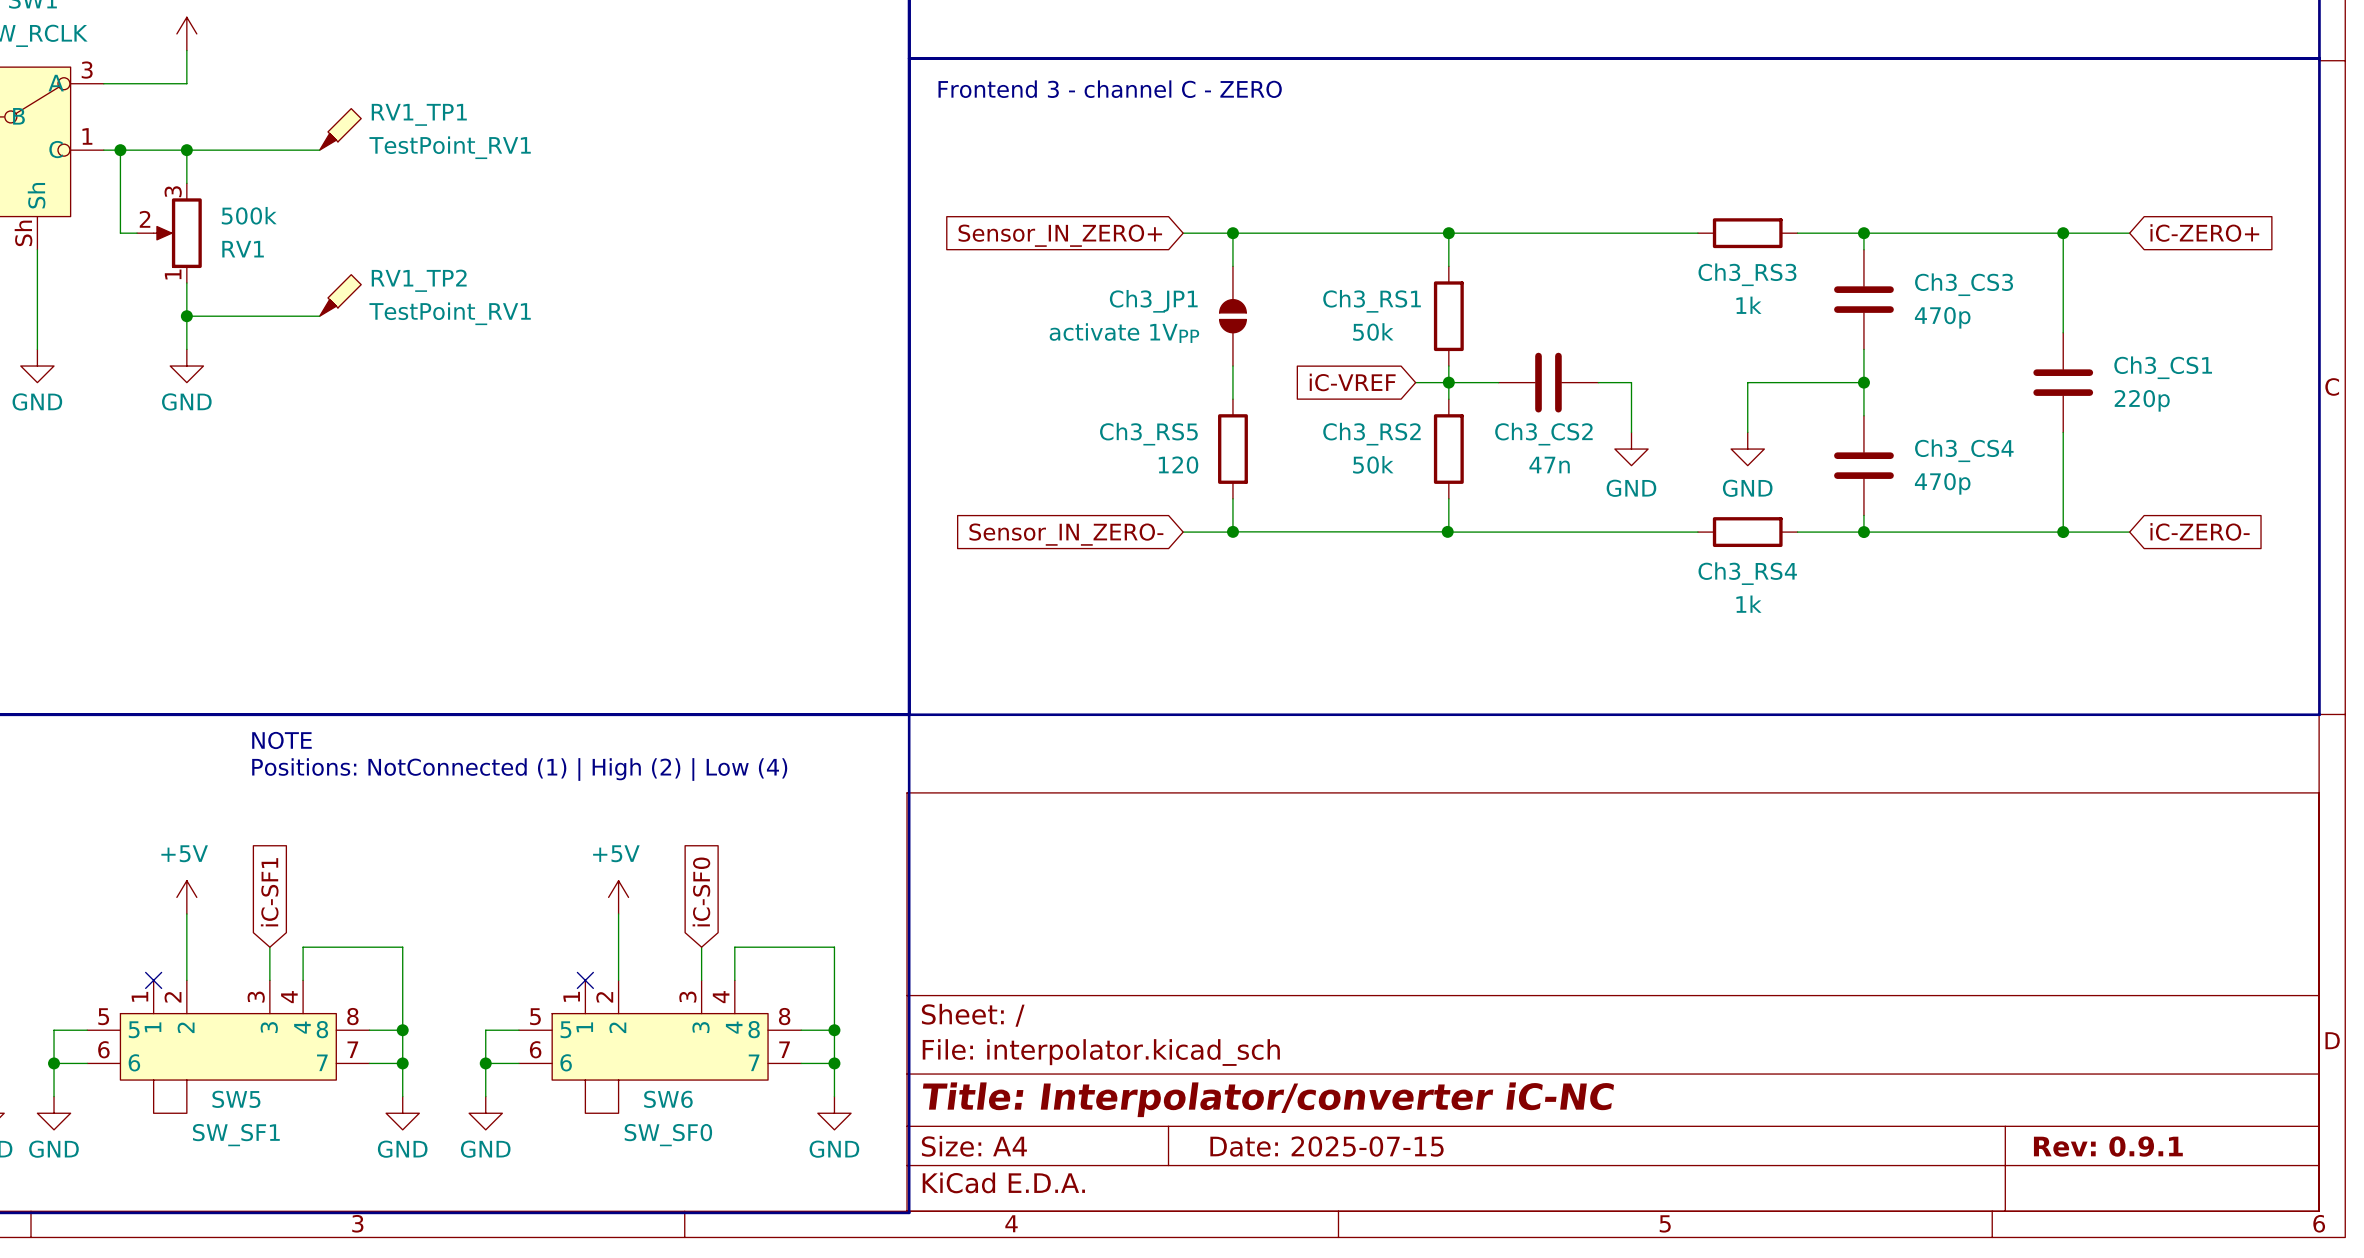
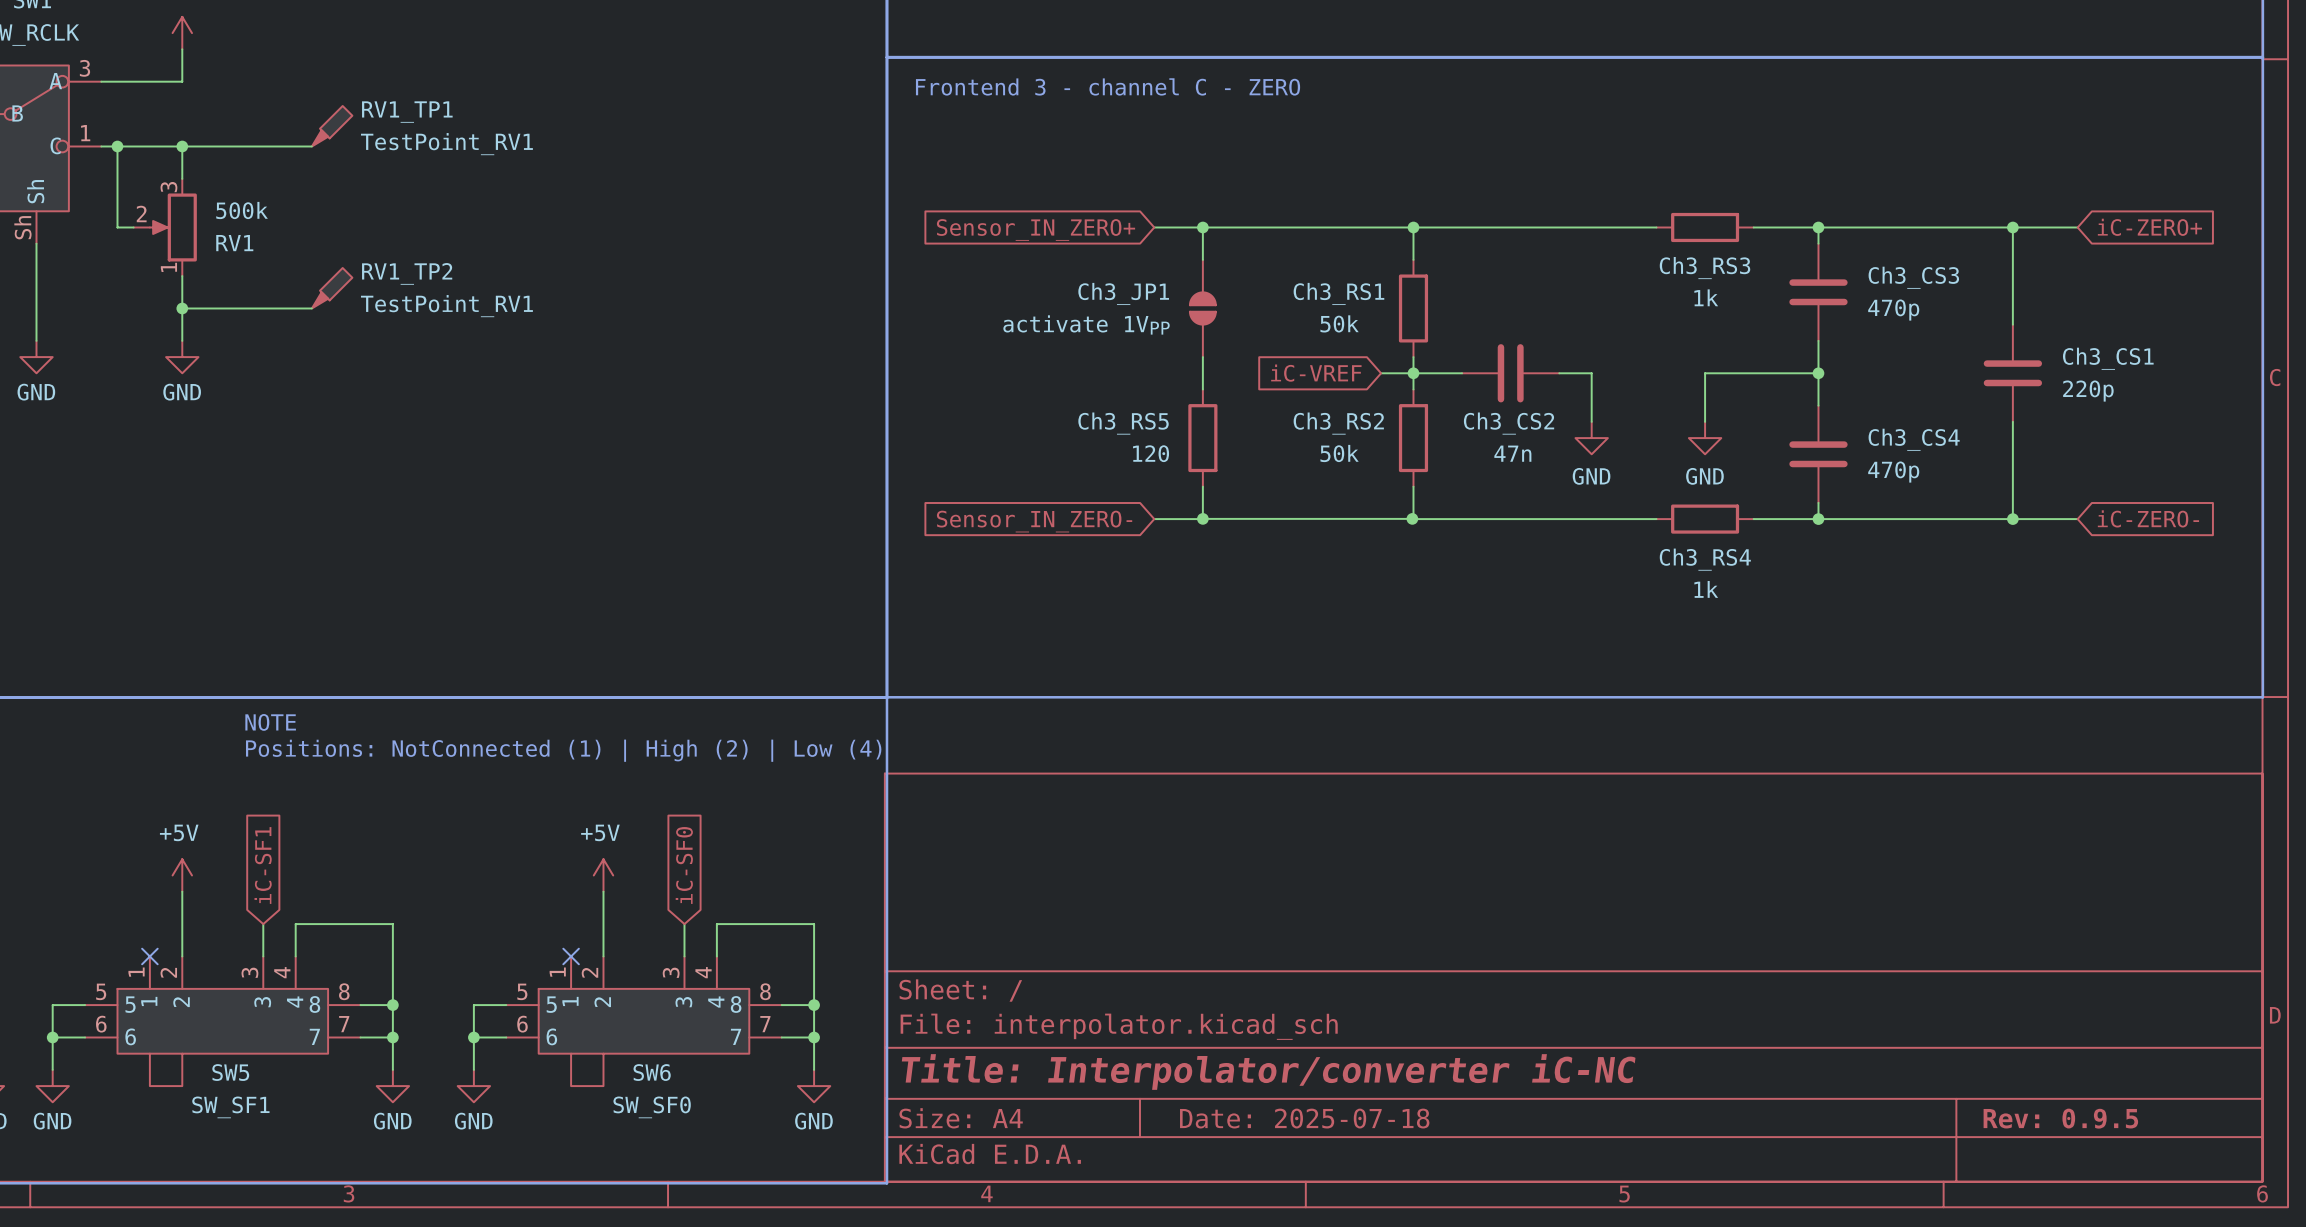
title block: Date: 2025-07-15 (1327, 1146) -> Date: 2025-07-18 (1304, 1118)
title block: Rev: 0.9.1 (2108, 1146) -> Rev: 0.9.5 (2060, 1118)

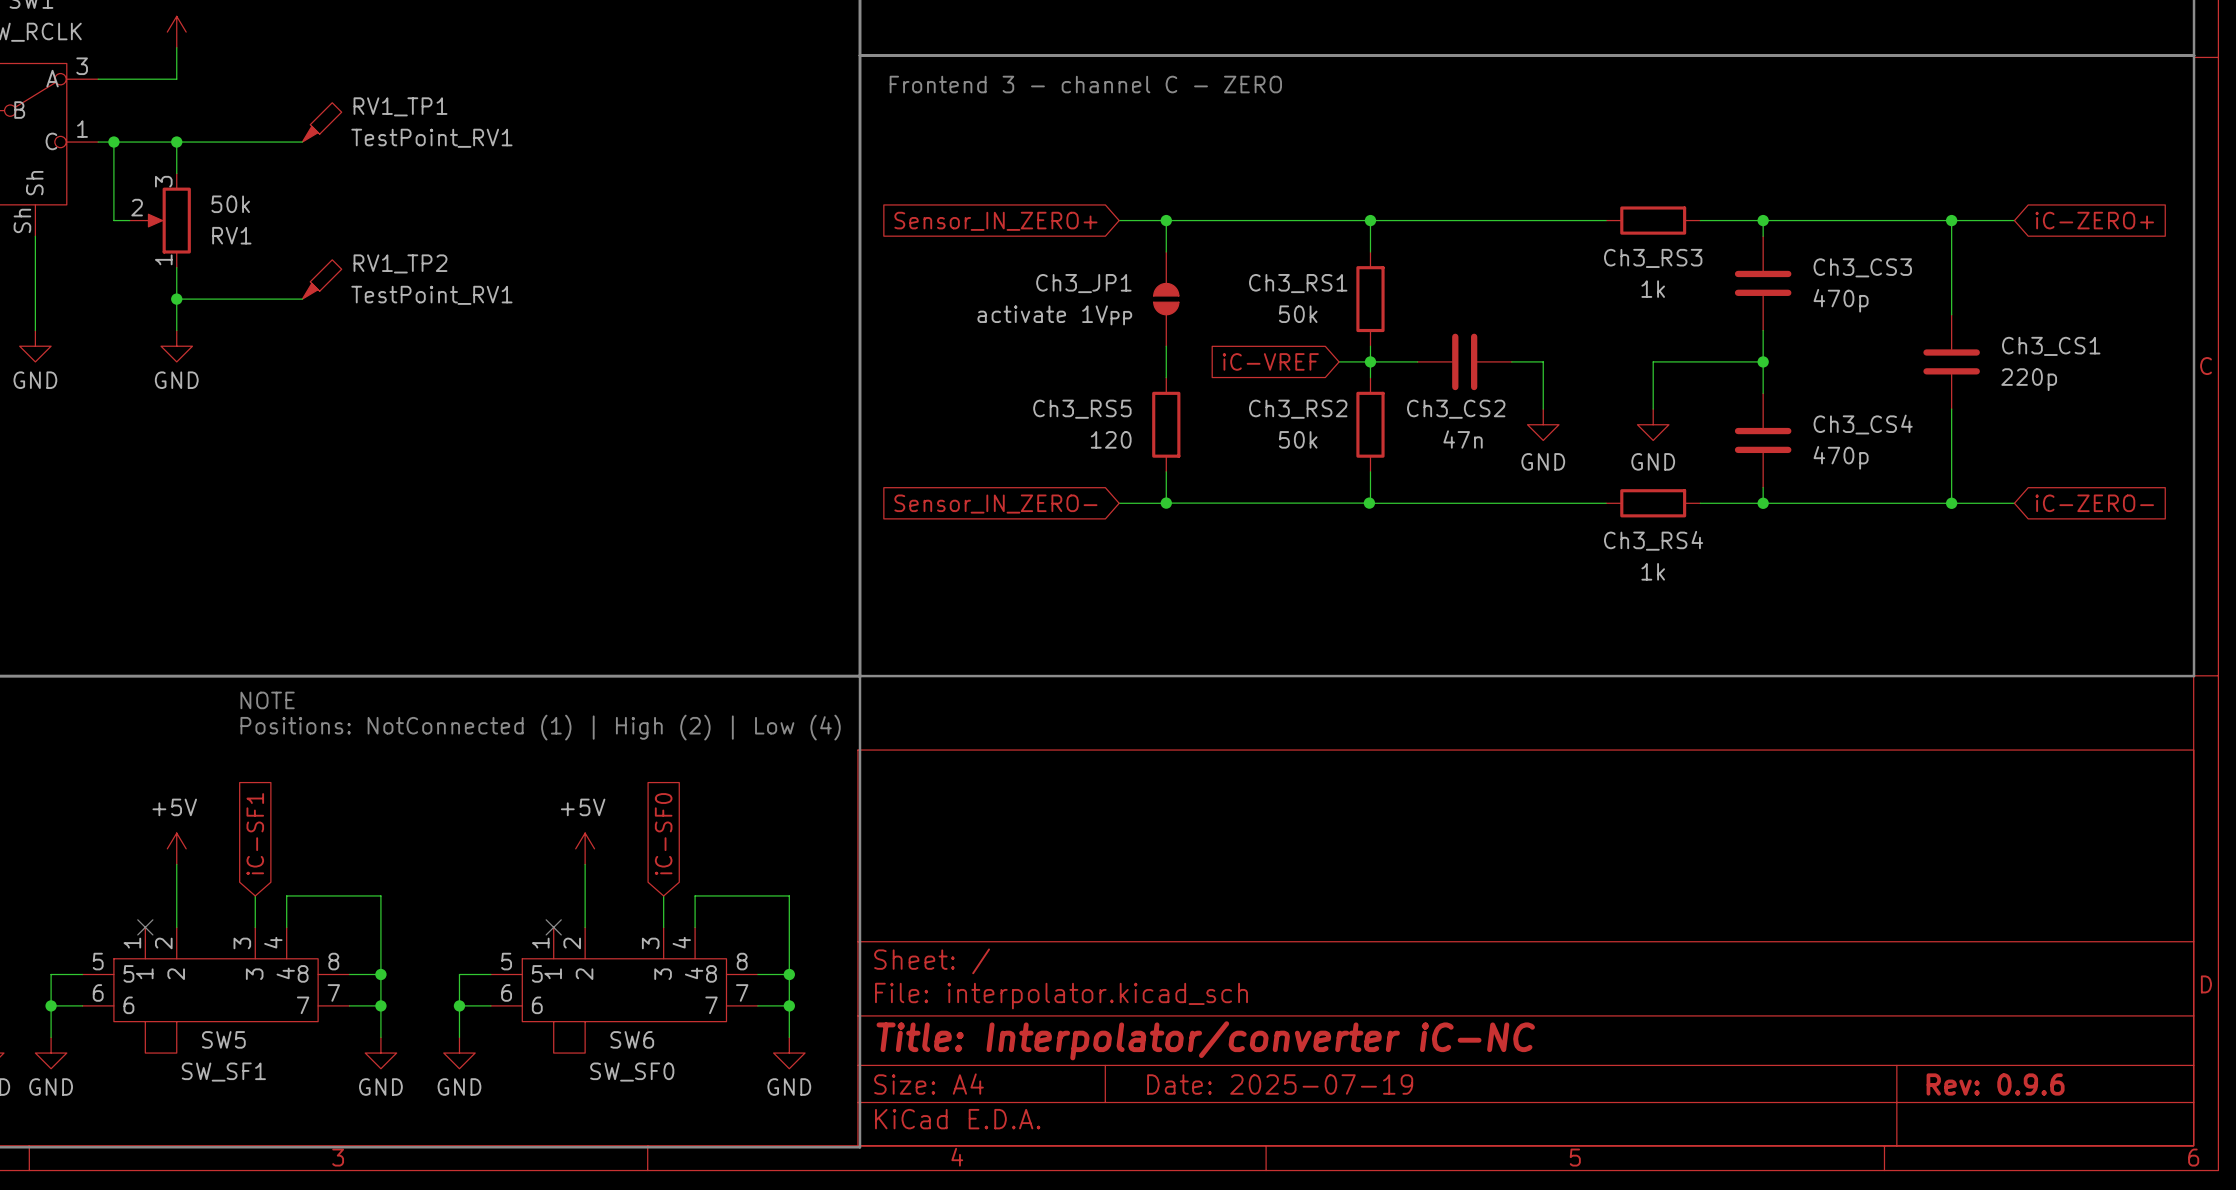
RV1 value: 500k (242, 210) -> 50k (230, 204)
title block: Date: 2025-07-18 (1304, 1118) -> Date: 2025-07-19 (1280, 1084)
title block: Rev: 0.9.5 (2060, 1118) -> Rev: 0.9.6 (1995, 1084)

